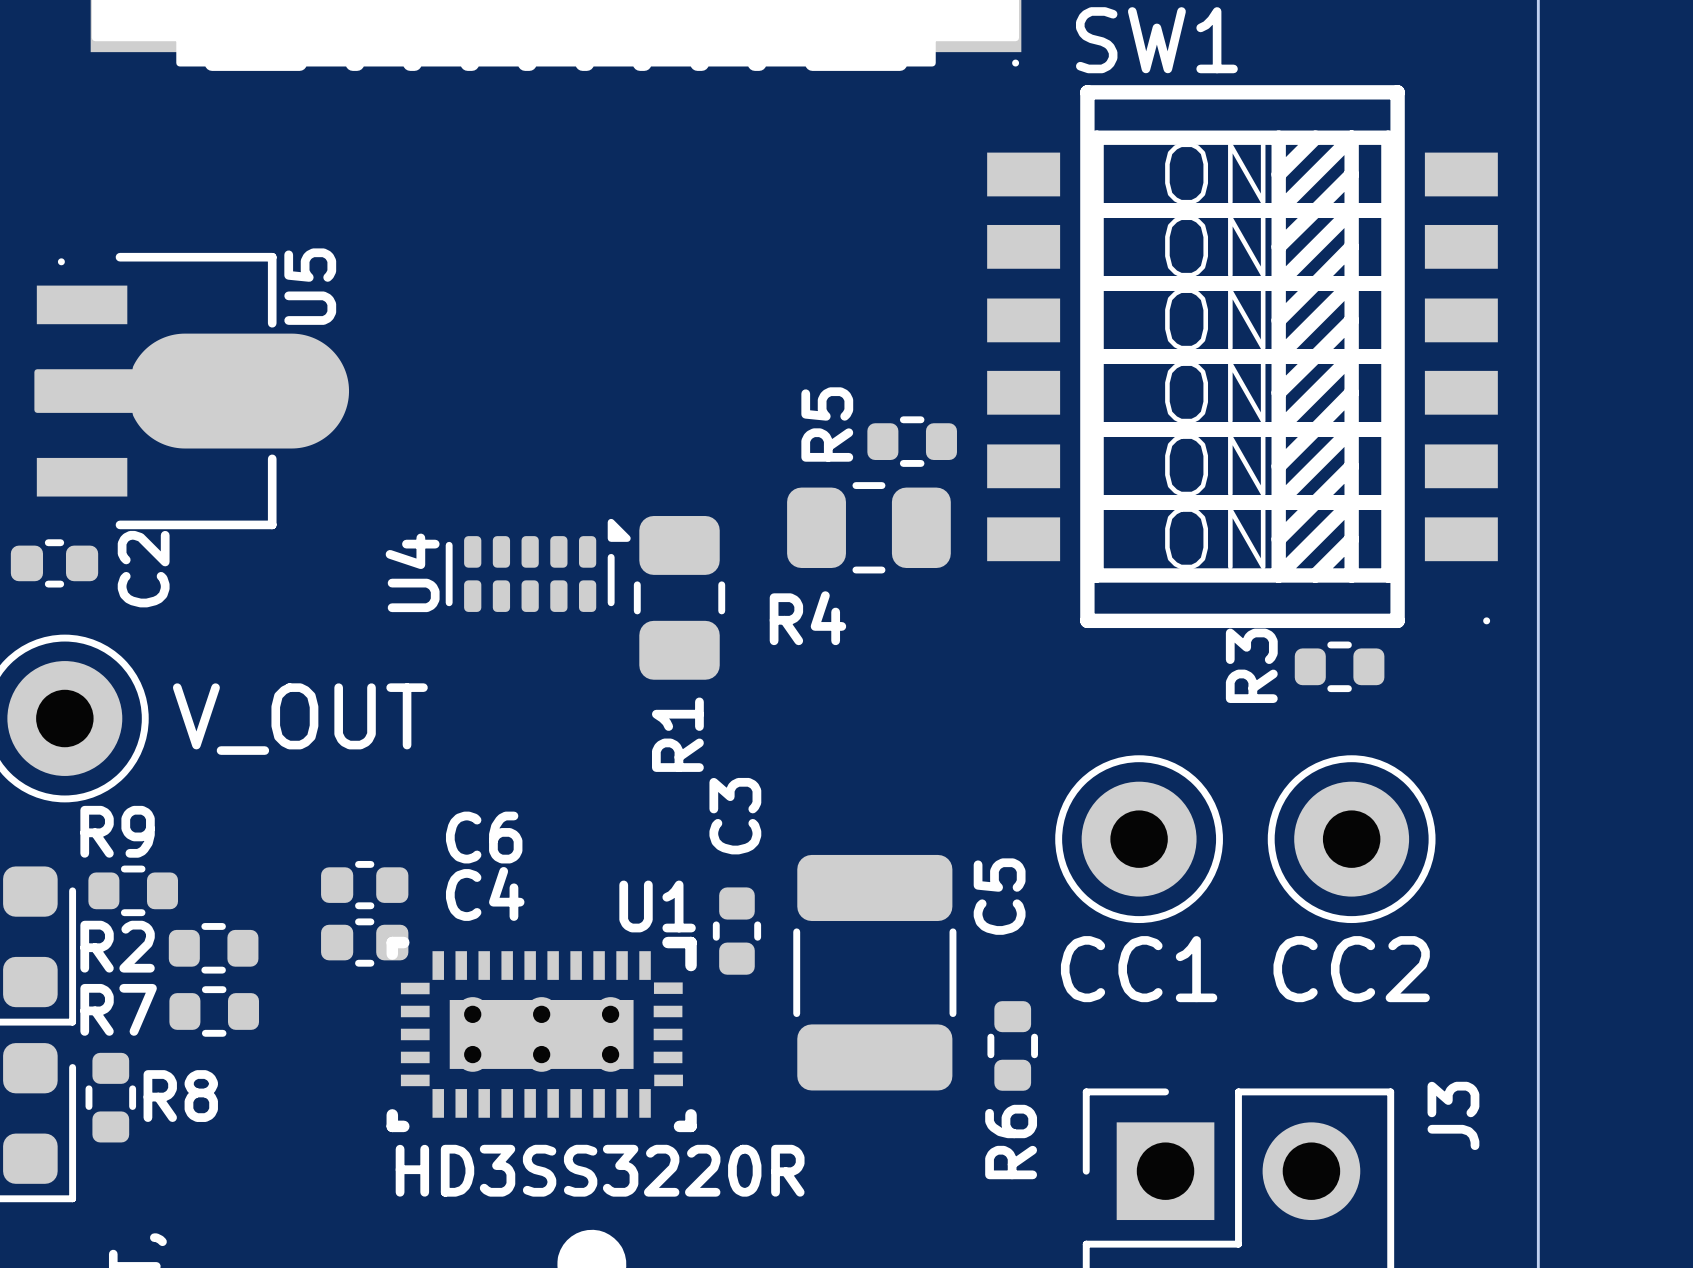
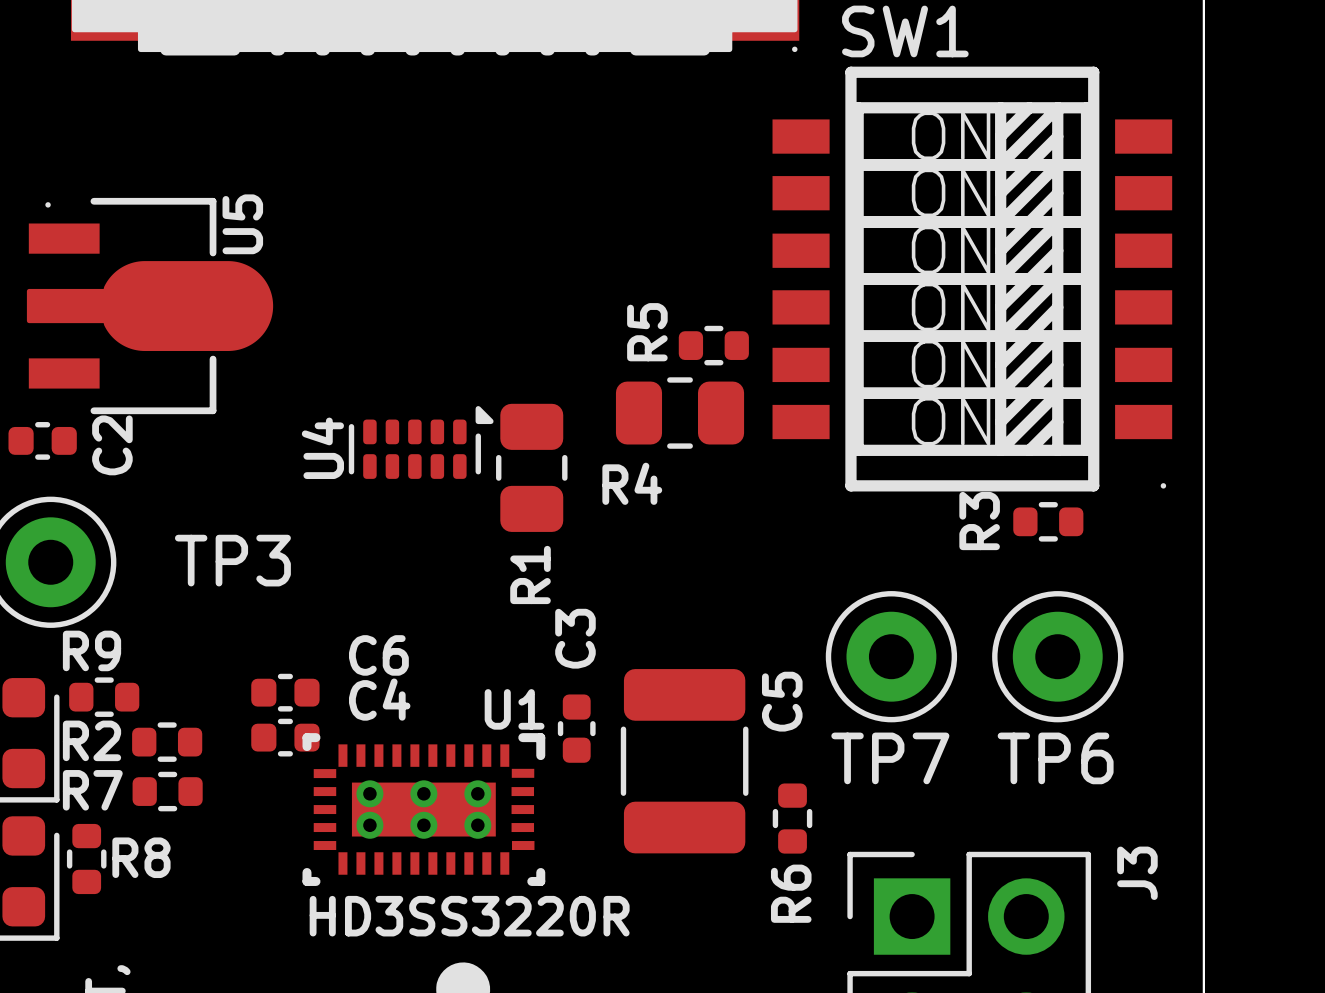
V_OUT name: V_OUT (300, 719) -> TP3 (232, 560)
CC1 name: CC1 (1139, 969) -> TP7 (890, 758)
CC2 name: CC2 (1351, 969) -> TP6 (1055, 758)

